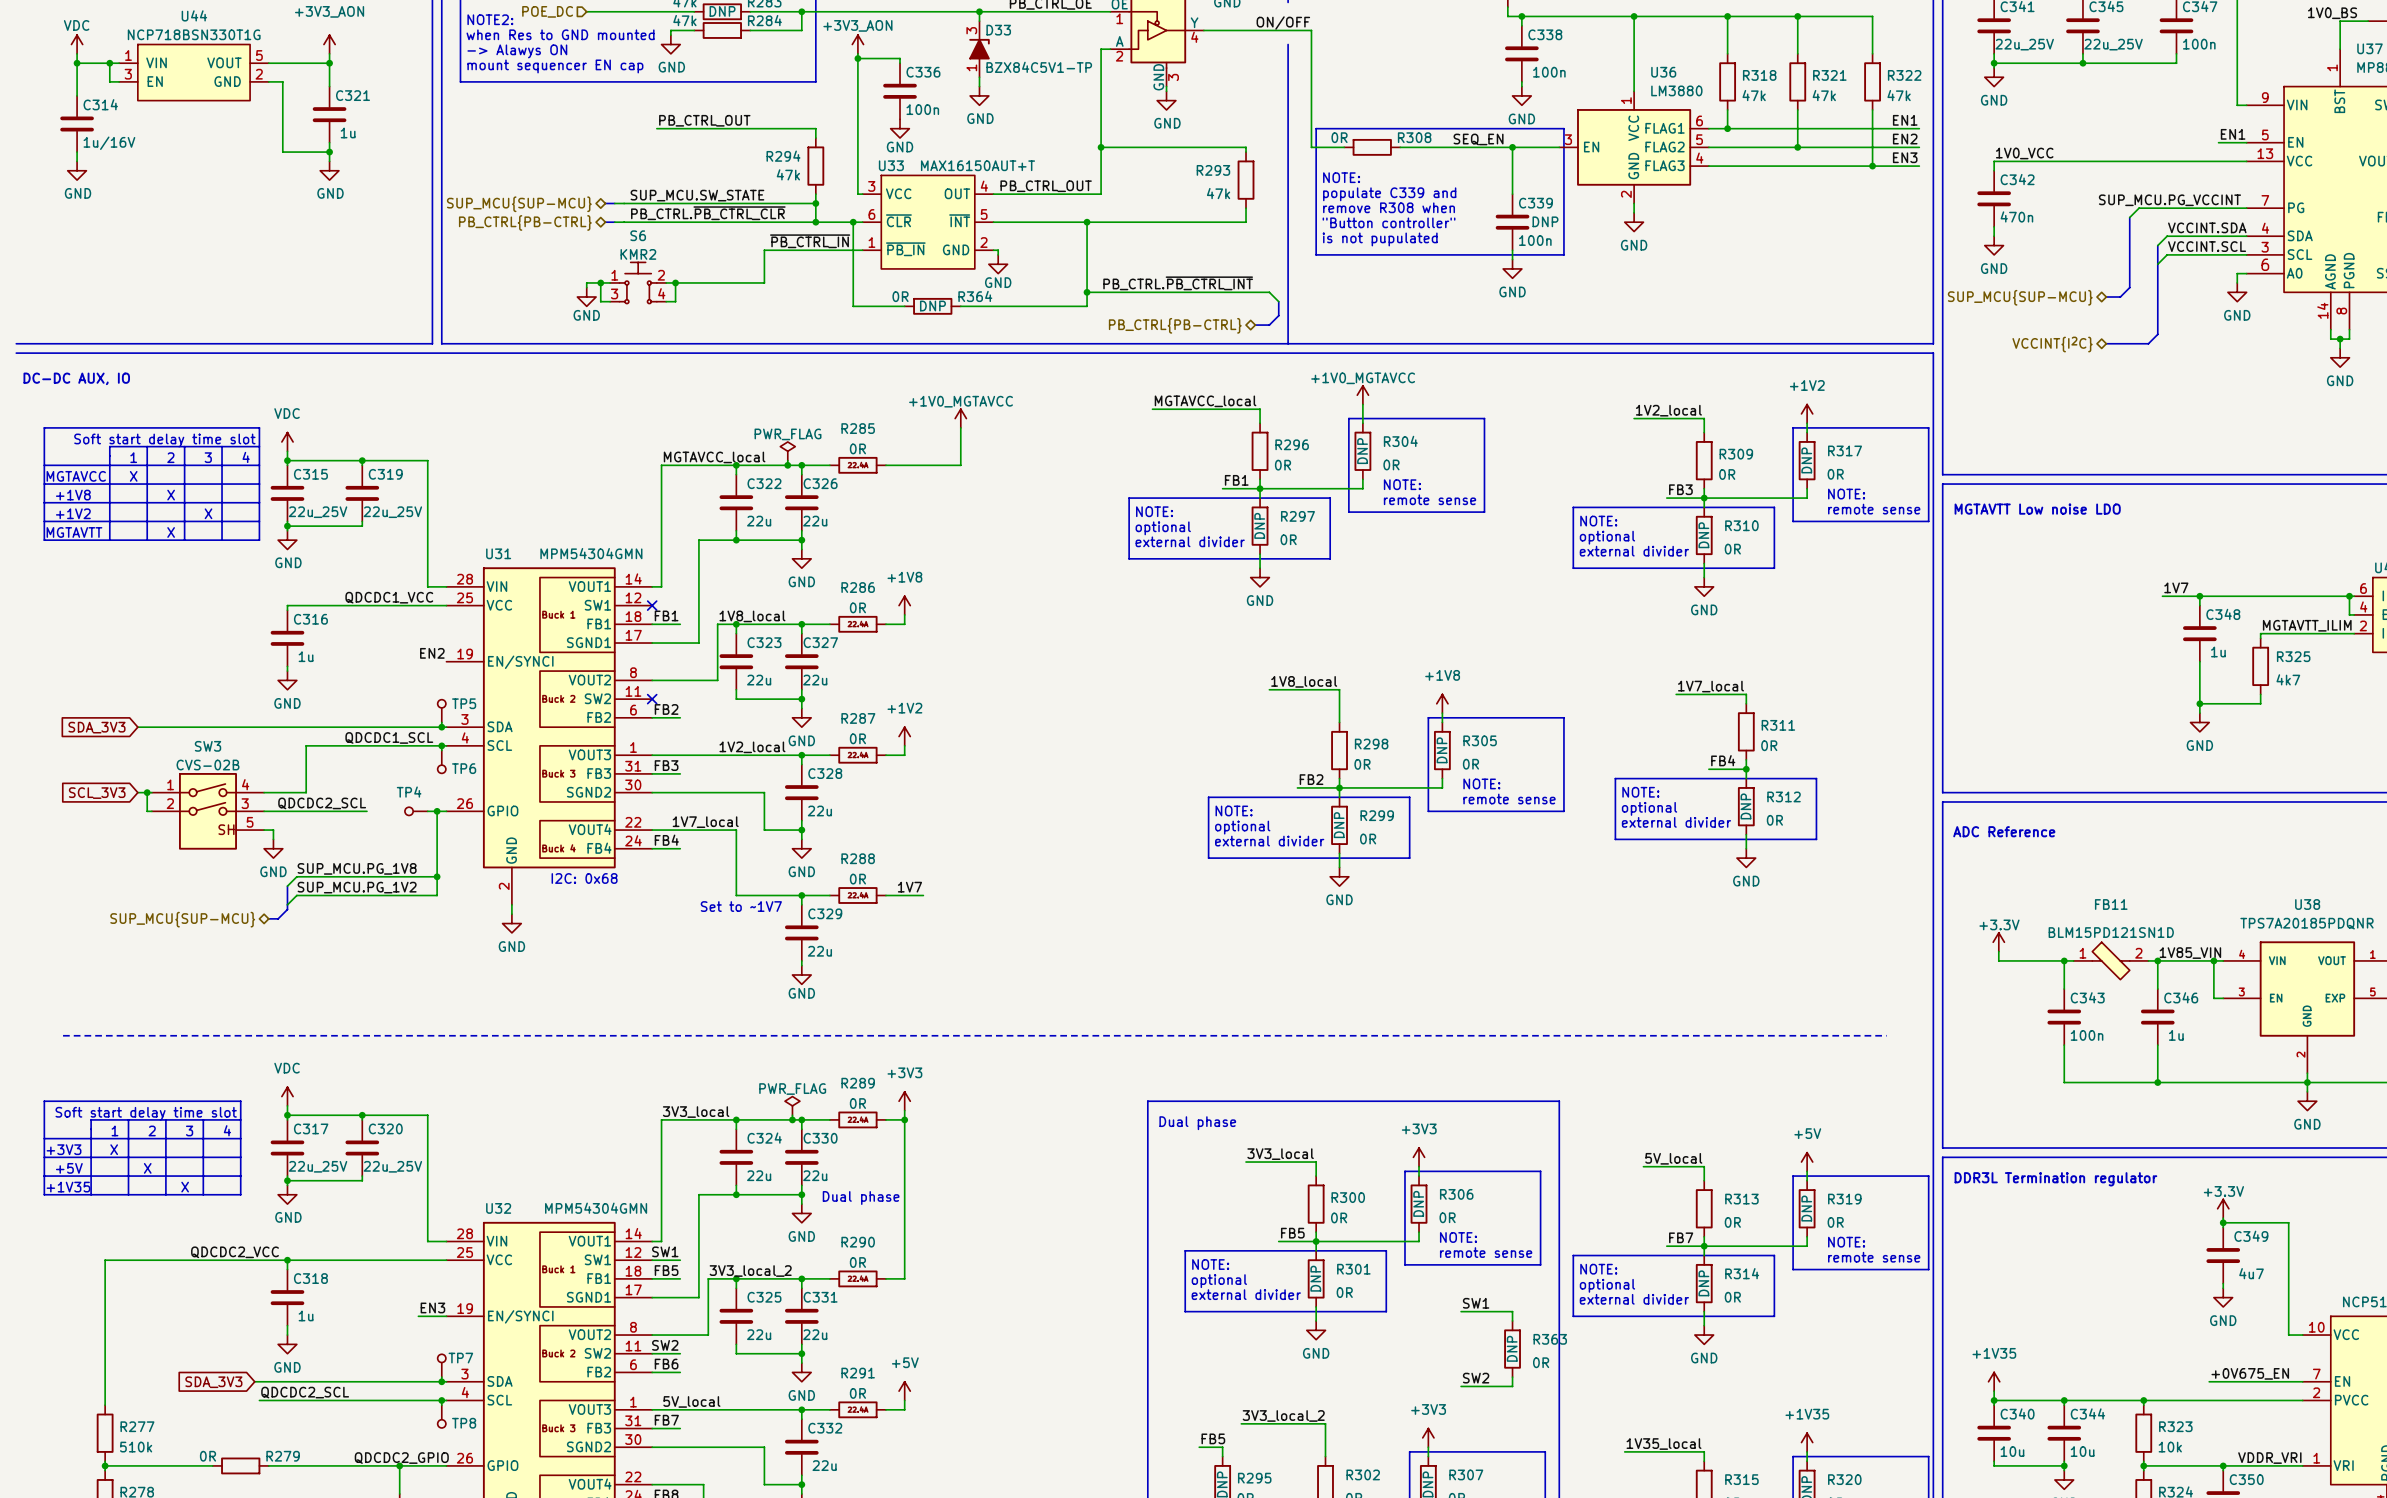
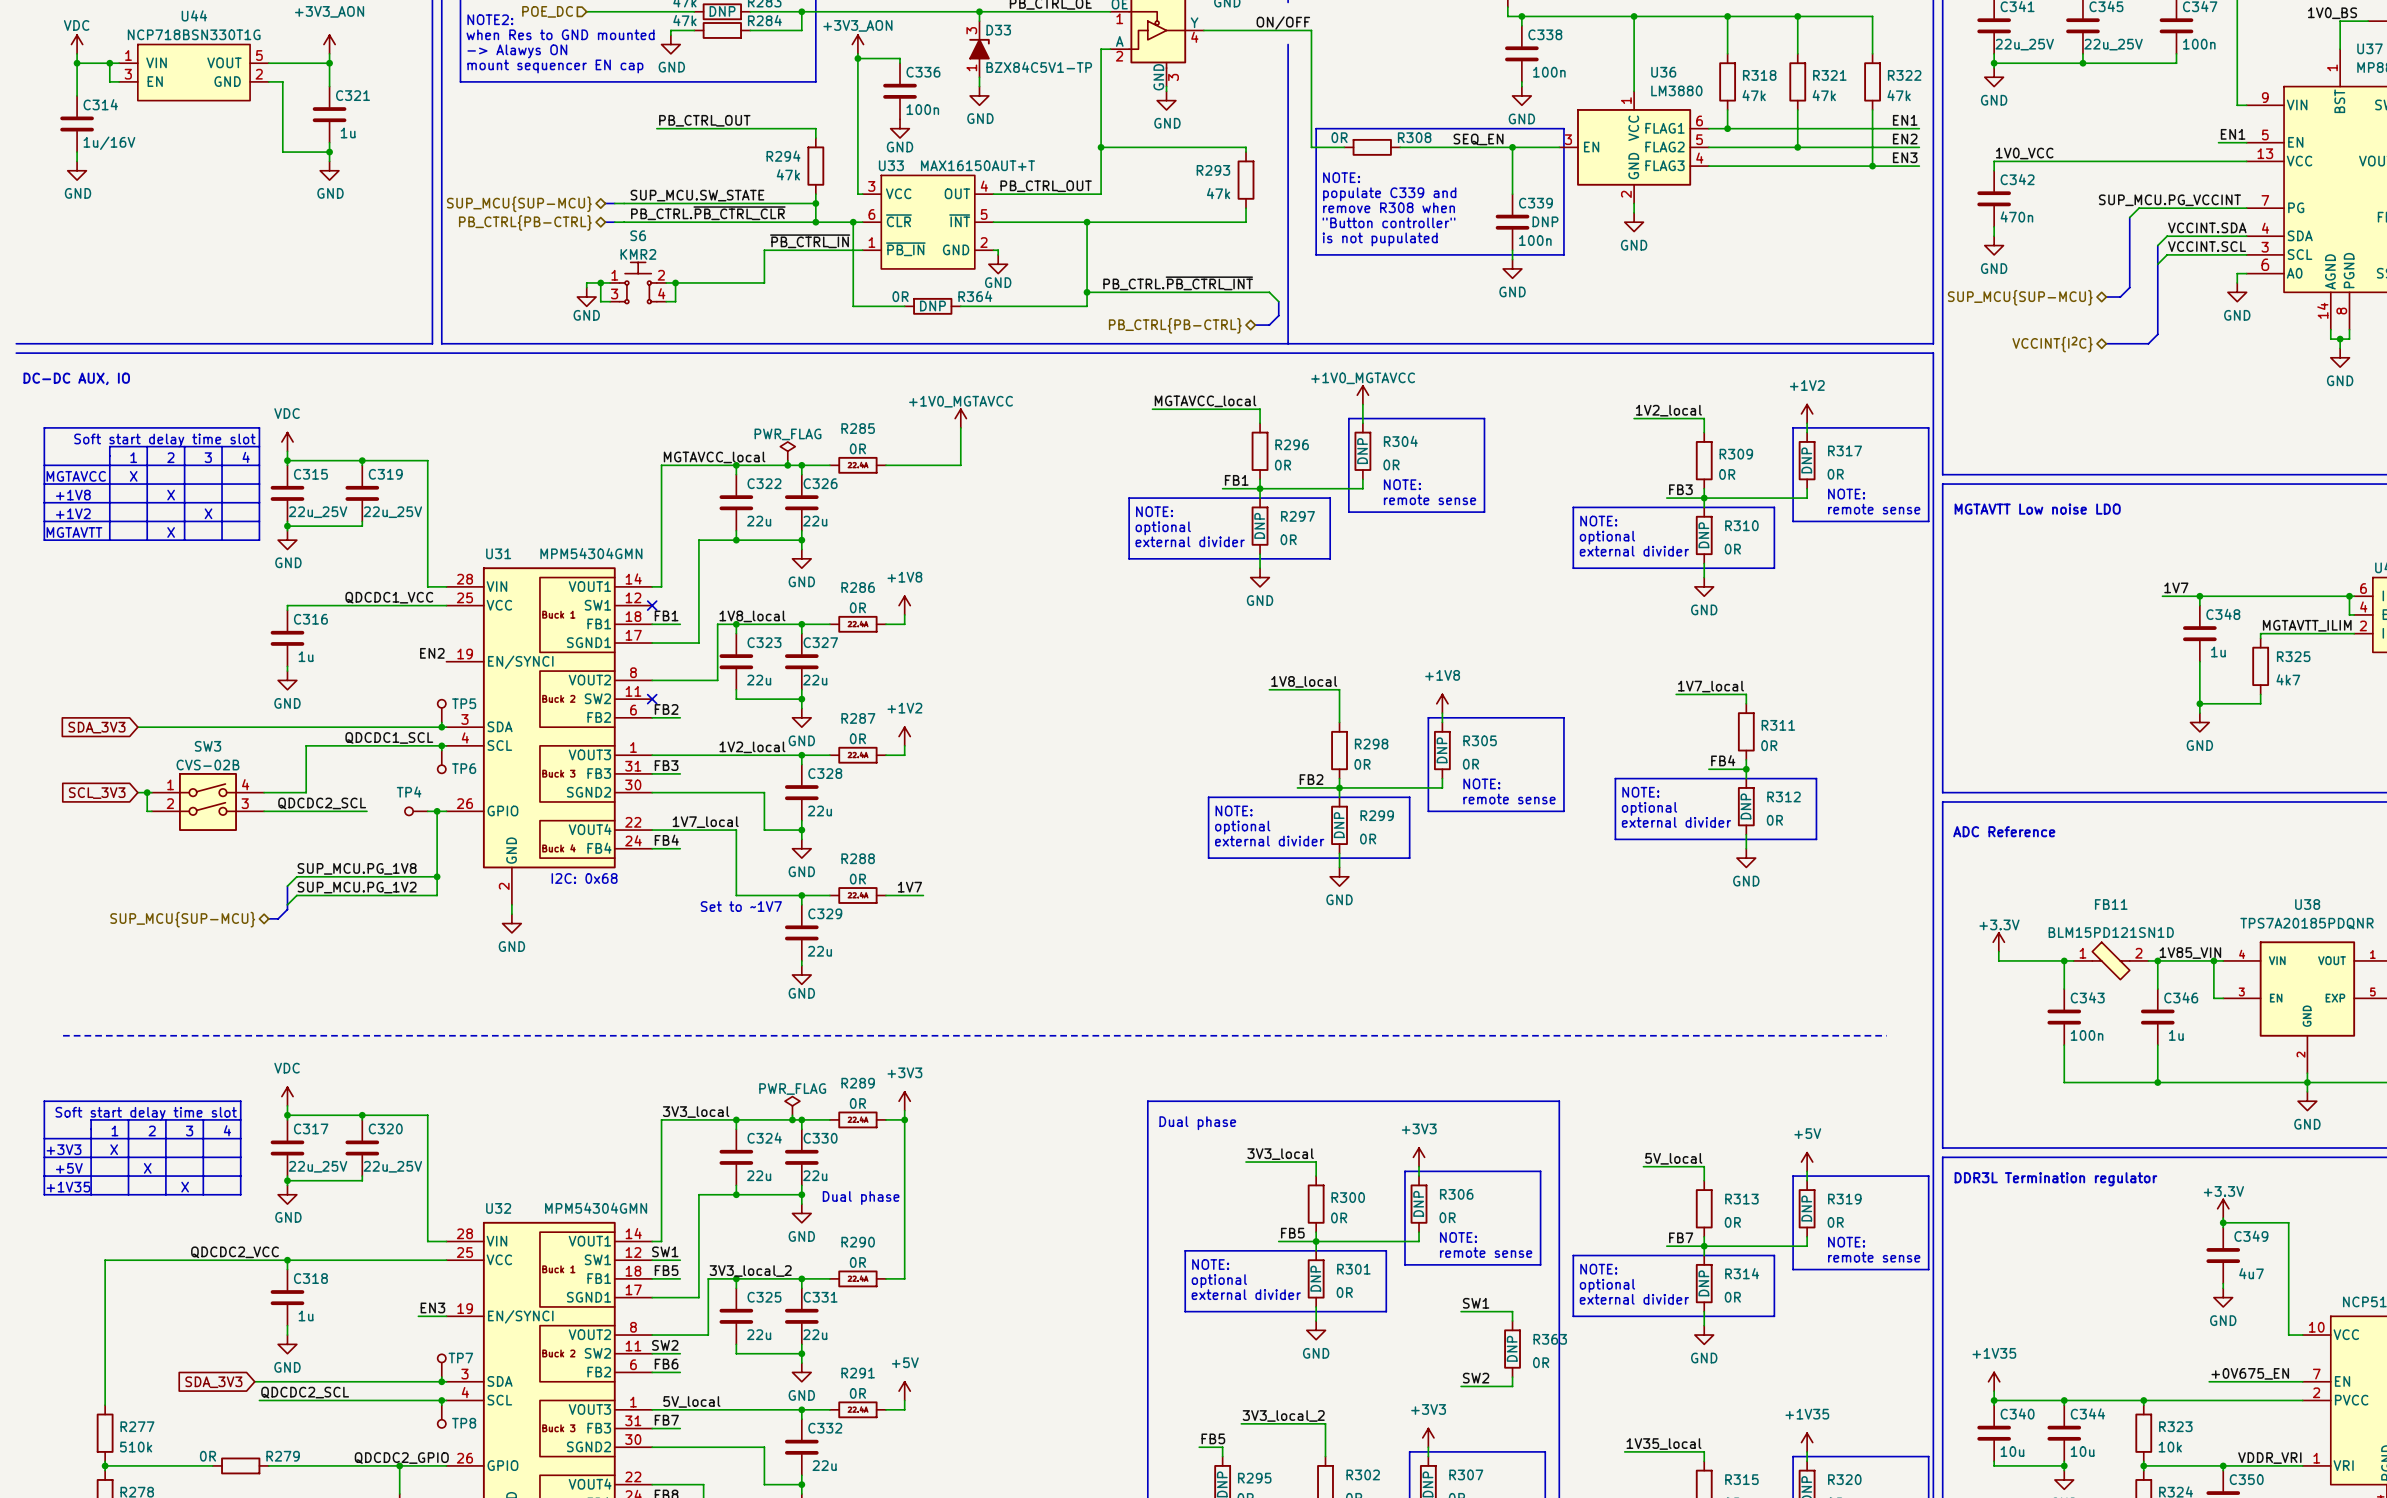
SW3 symbol: [151, 772, 265, 850] -> [151, 772, 265, 831]
wire: (264, 830) (273, 830) (273, 839) -> none
power symbol: GND (273, 848) -> none

